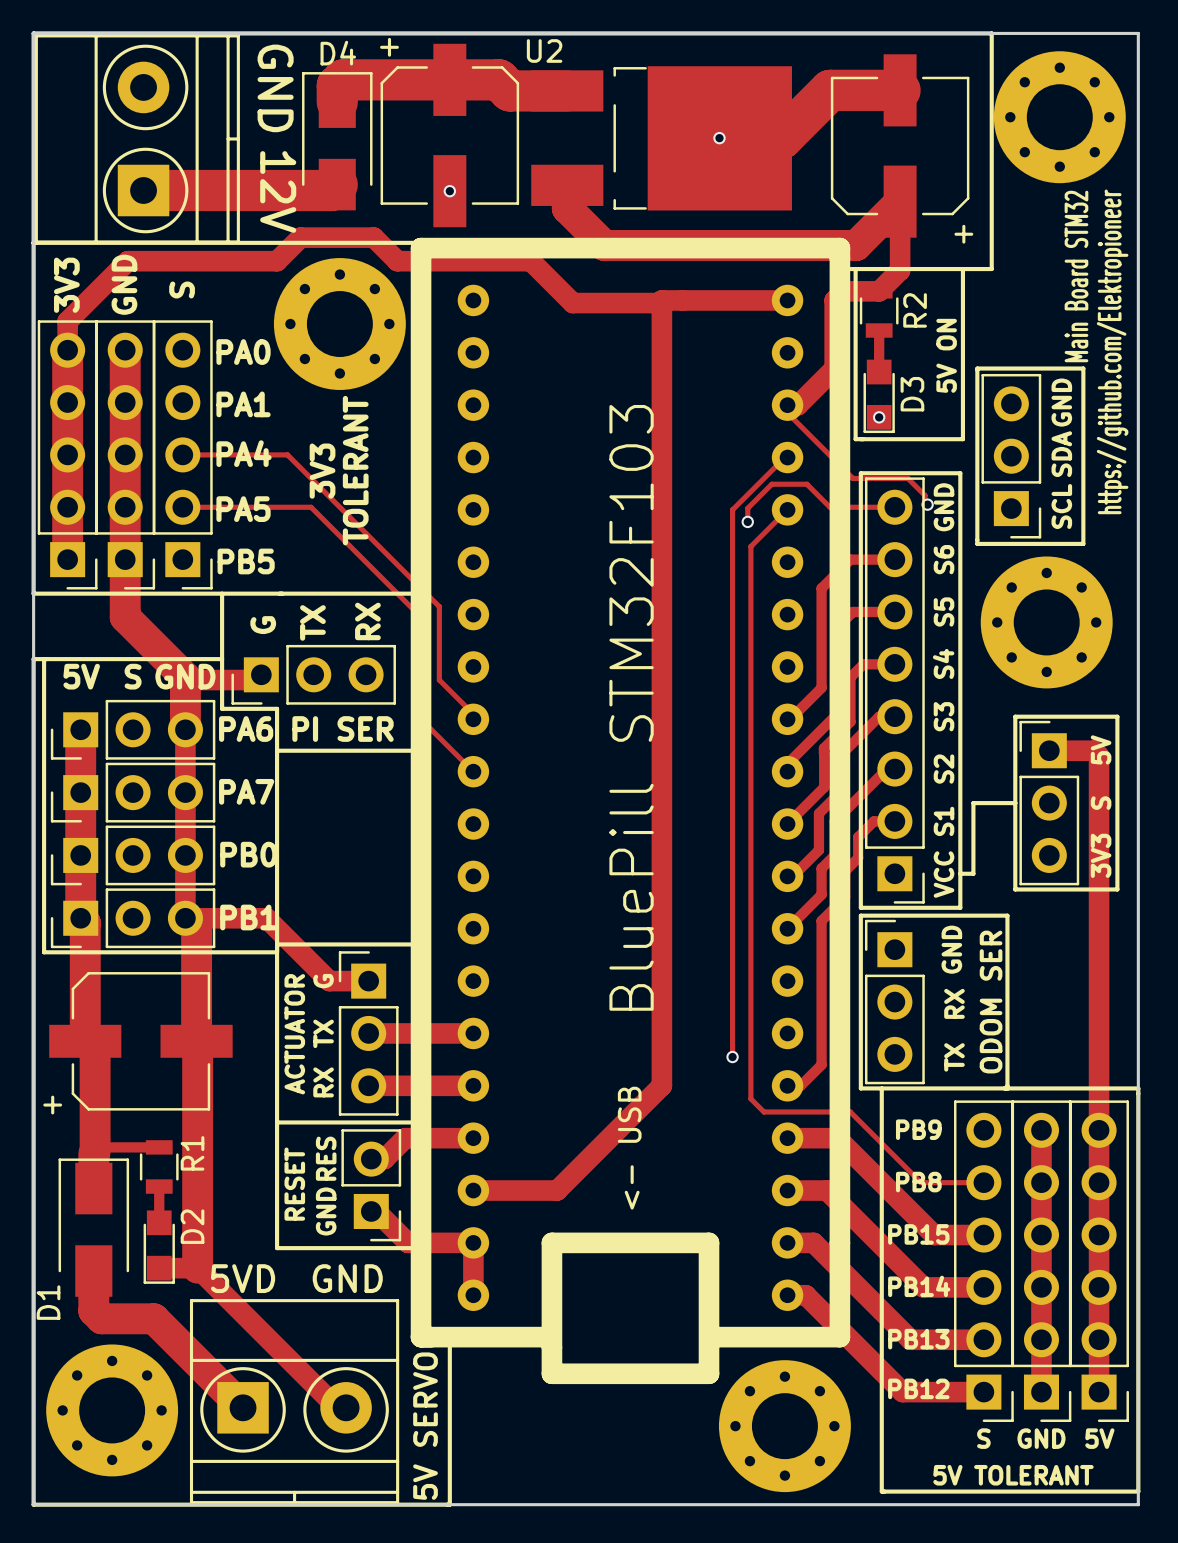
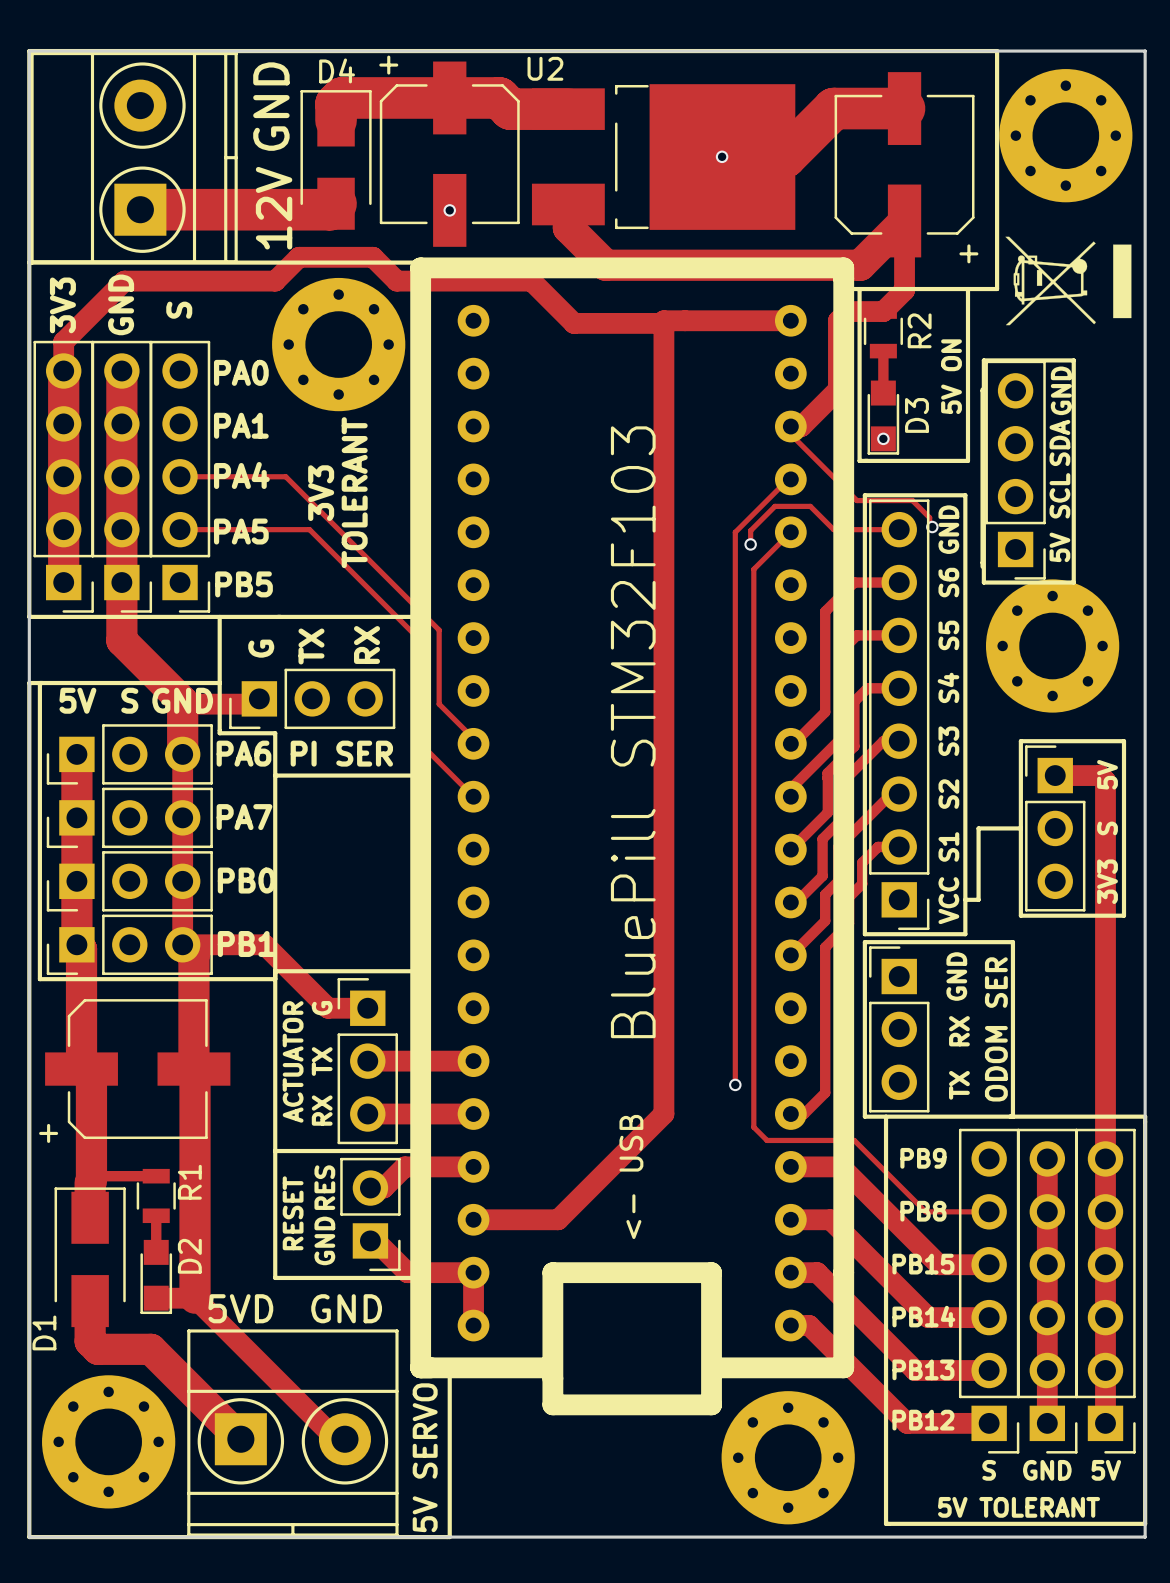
text rotation: 0° (275, 88) -> 180° (271, 106)
text rotation: 0° (278, 191) -> 180° (274, 208)
drawing: none -> [1005, 236, 1132, 326]
text: Main Board STM32 (1076, 276) -> none
line: none -> (983, 360) (1073, 360) (1073, 582) (983, 582) (983, 360)
text: https://github.com/Elektropioneer (1112, 351) -> none
line: (977, 368) (1083, 368) (1083, 543) (977, 543) -> none
part footprint: [981, 373, 1042, 539] -> [985, 360, 1046, 580]
text position: GND (1061, 402) -> GND (1061, 390)
text position: SDA (1061, 454) -> SDA (1059, 442)
text position: SCL (1061, 506) -> SCL (1059, 495)
text: none -> 5V (1059, 547)

